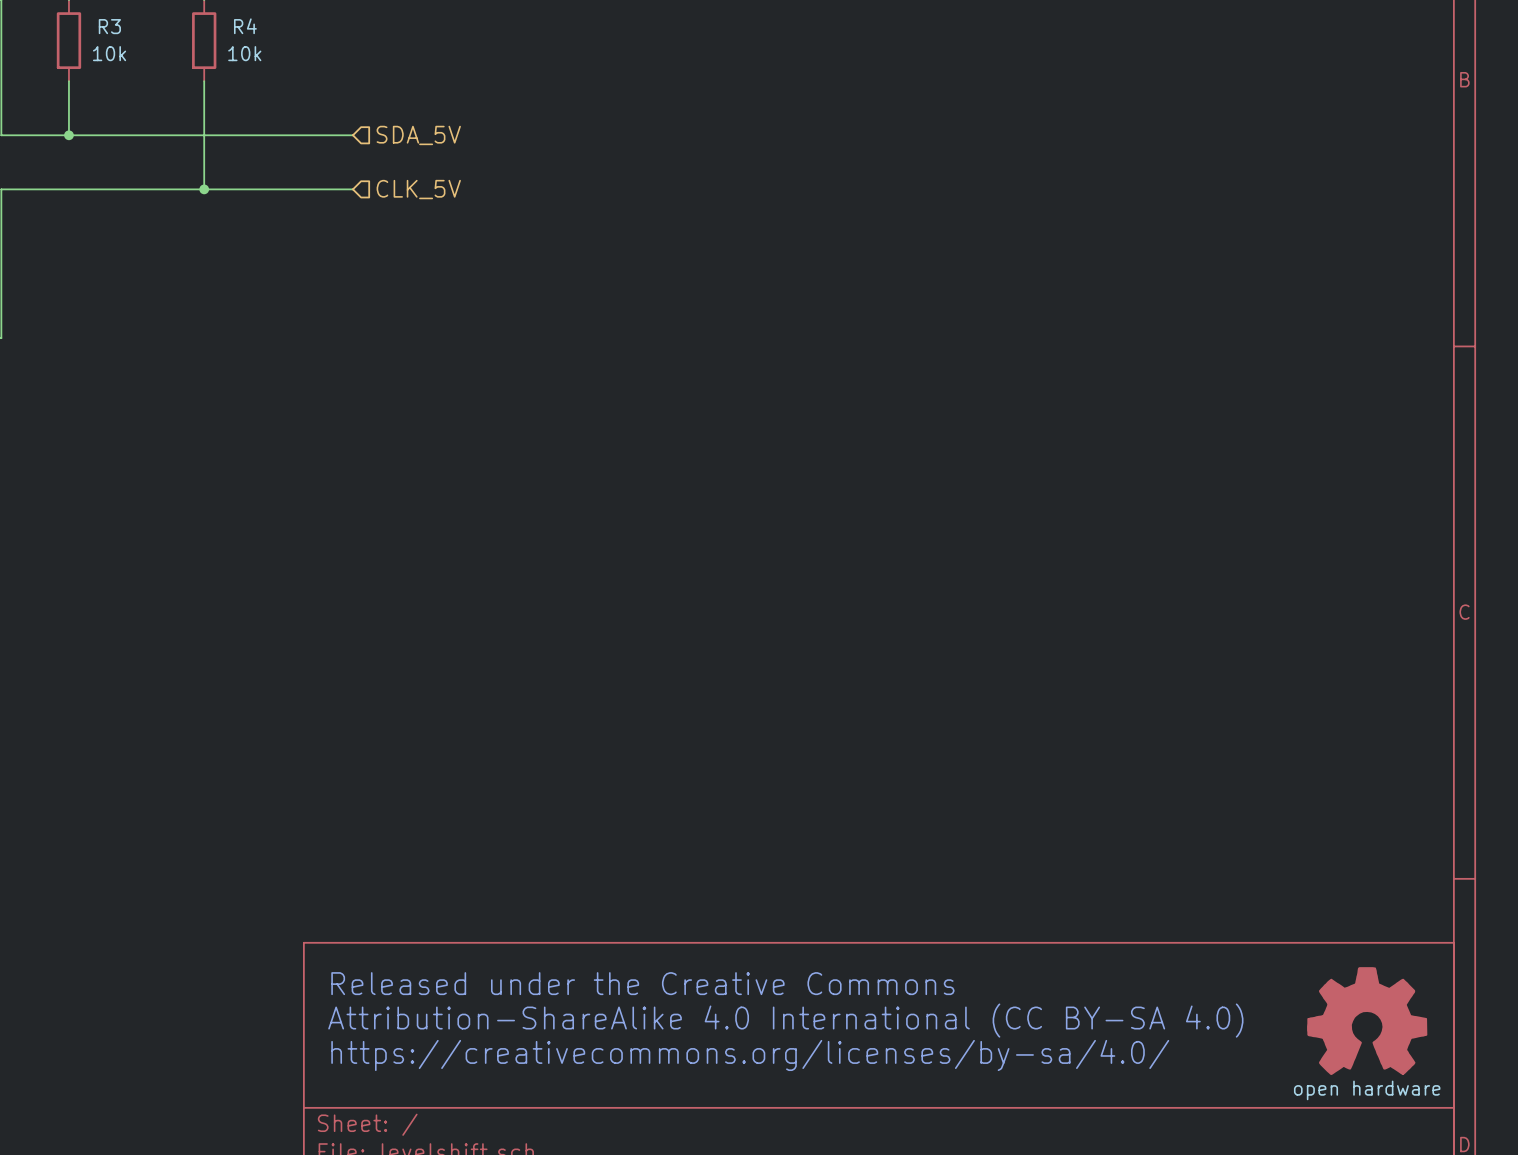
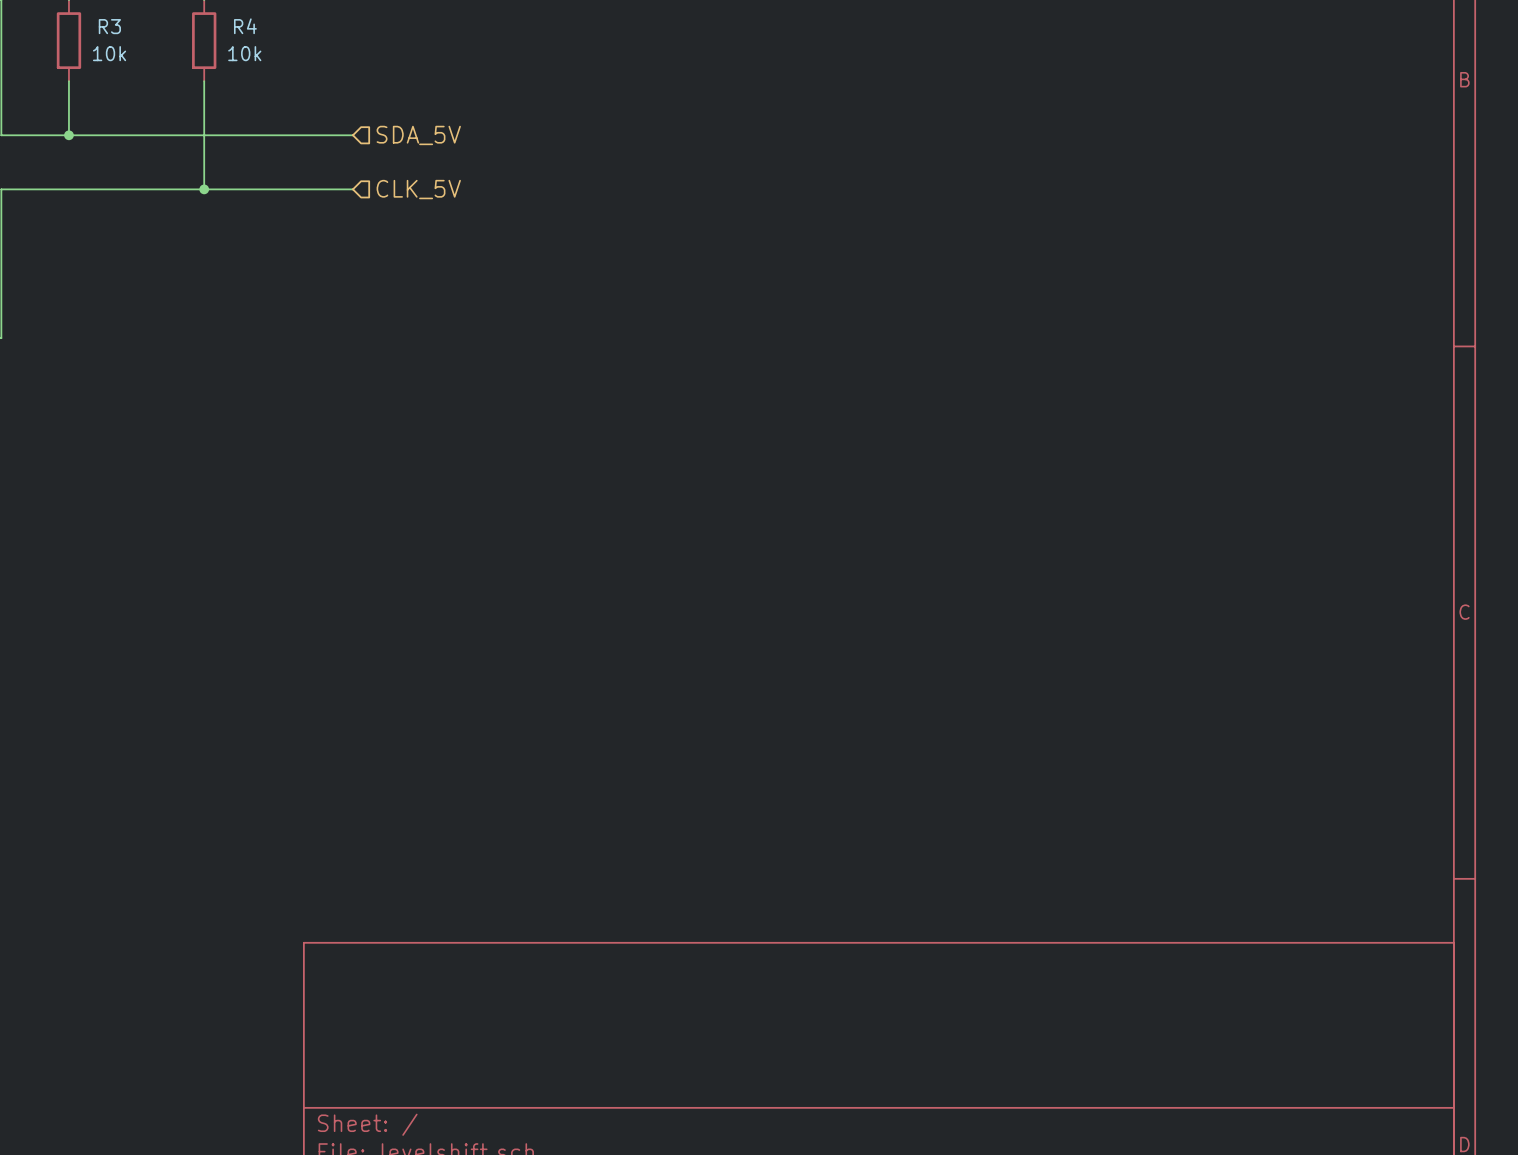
text: Released under the Creative Commons (642, 983) -> none
text: Attribution-ShareAlike 4.0 International (CC BY-SA 4.0) (785, 1020) -> none
power symbol: open hardware (1367, 1021) -> none
text: https://creativecommons.org/licenses/by-sa/4.0/ (750, 1055) -> none

